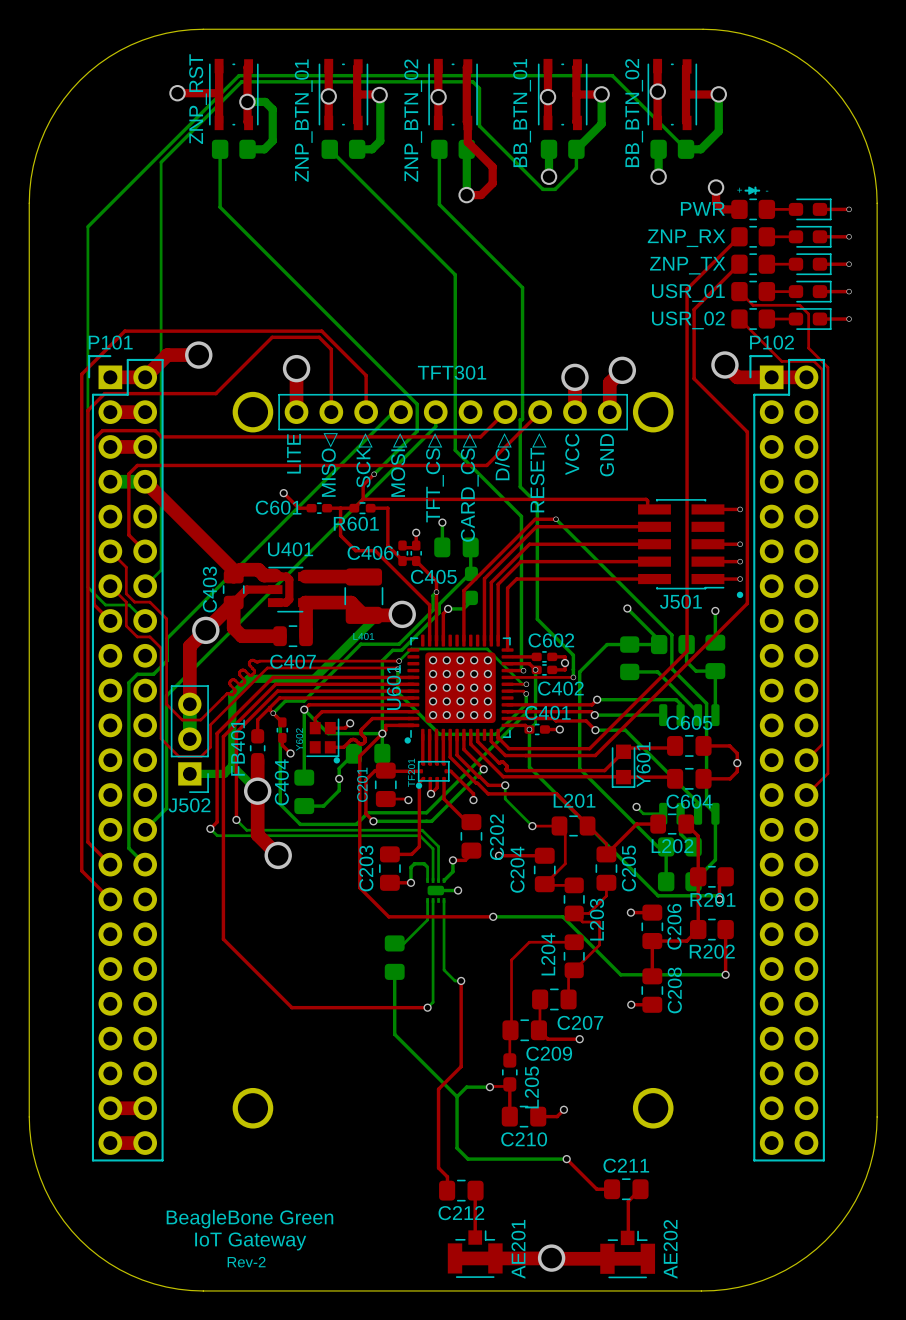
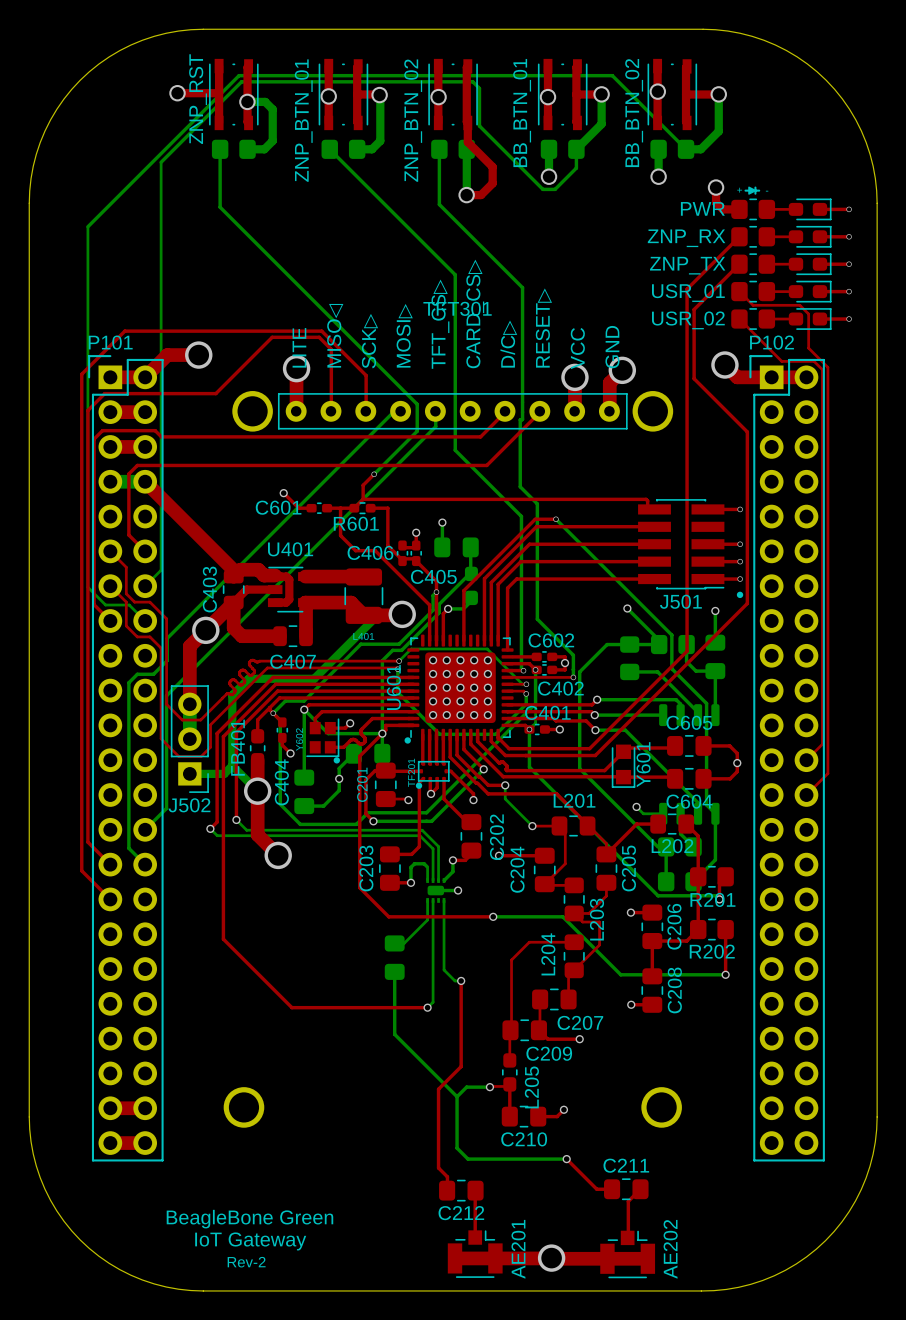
TFT301 name position: TFT301 (452, 372) -> TFT301 (457, 308)
TFT301 footprint: [232, 391, 674, 1129] -> [223, 391, 682, 1128]

